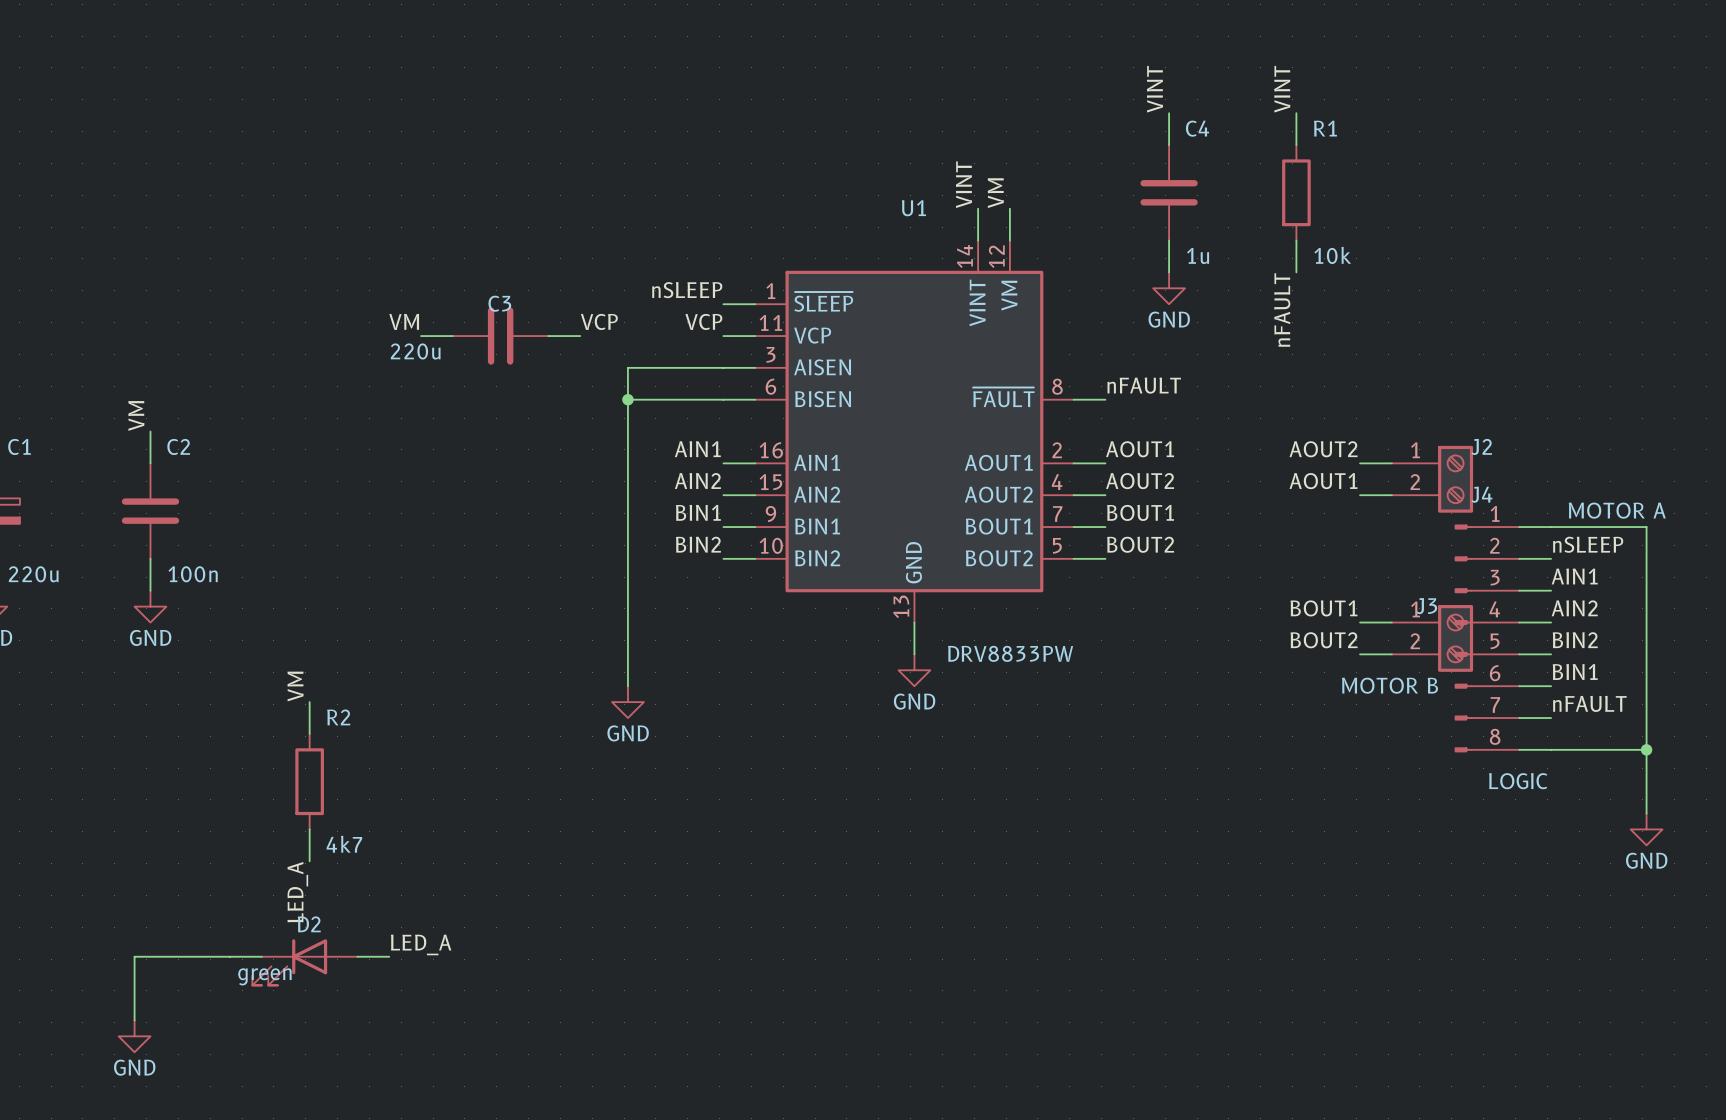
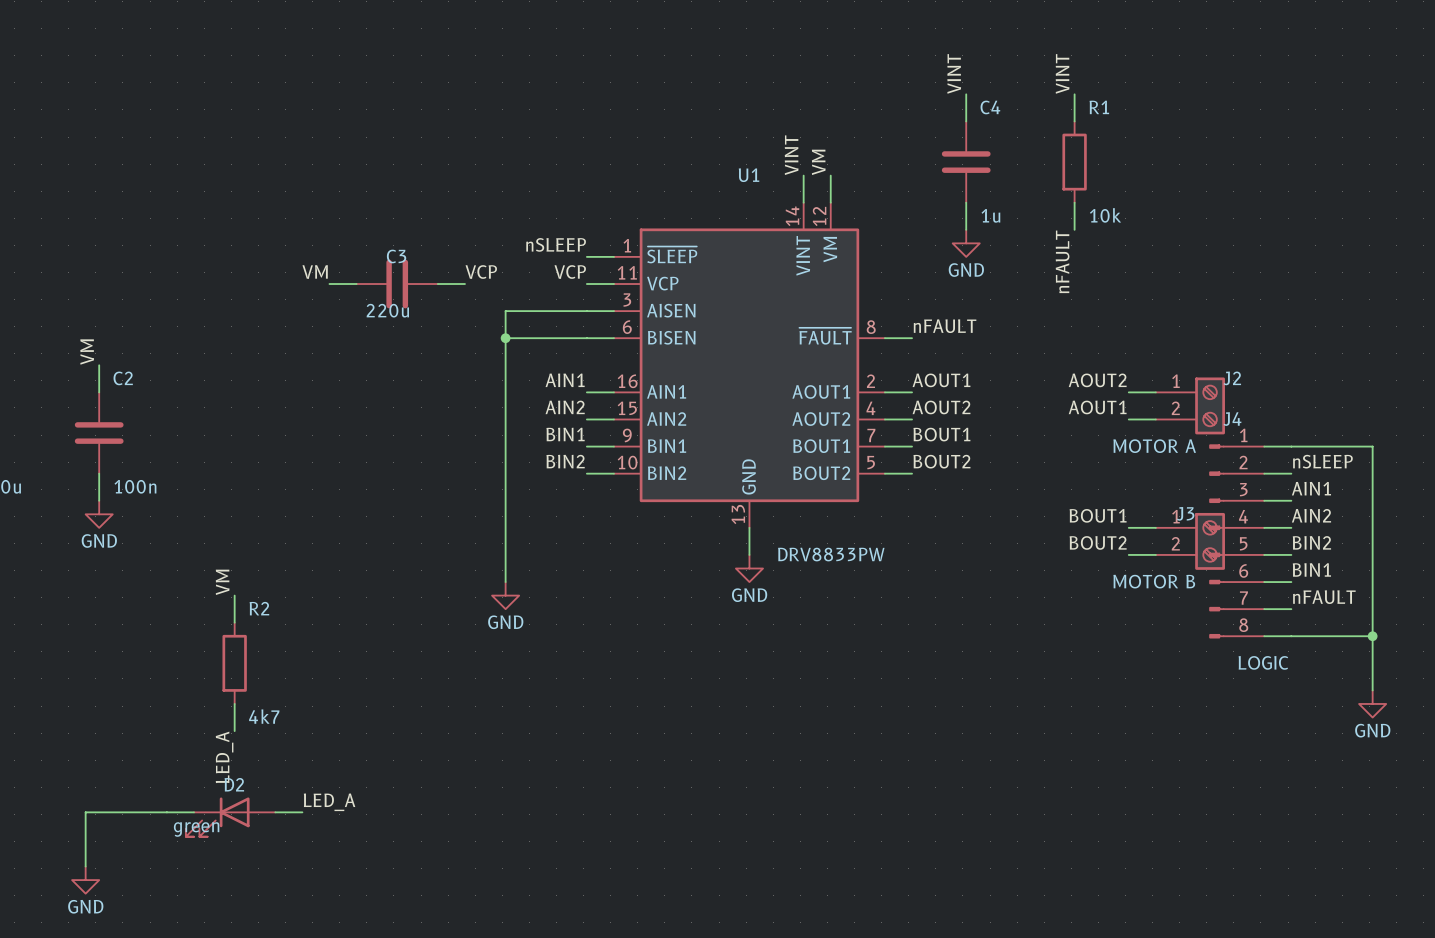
C3 value position: 220u (415, 351) -> 220u (387, 310)
J2 value position: MOTOR A (1617, 510) -> MOTOR A (1154, 446)

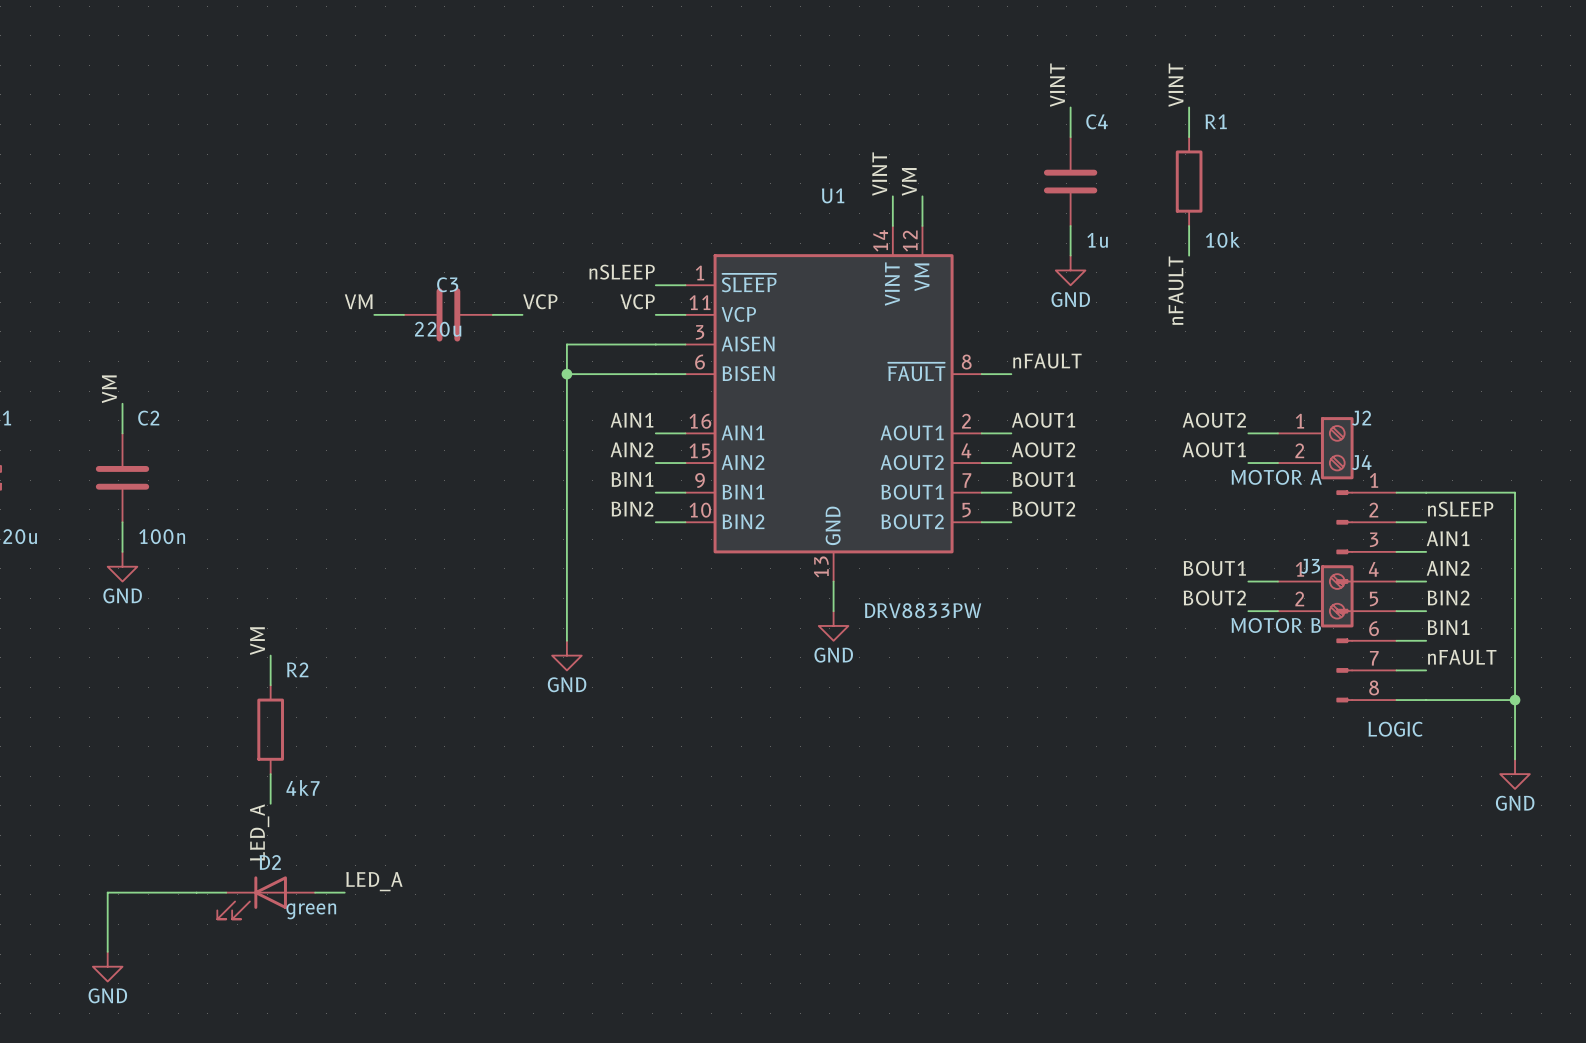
C3 value position: 220u (387, 310) -> 220u (438, 329)
J2 value position: MOTOR A (1154, 446) -> MOTOR A (1276, 477)
J3 value position: MOTOR B (1154, 581) -> MOTOR B (1276, 625)
D2 value position: green (196, 829) -> green (311, 911)

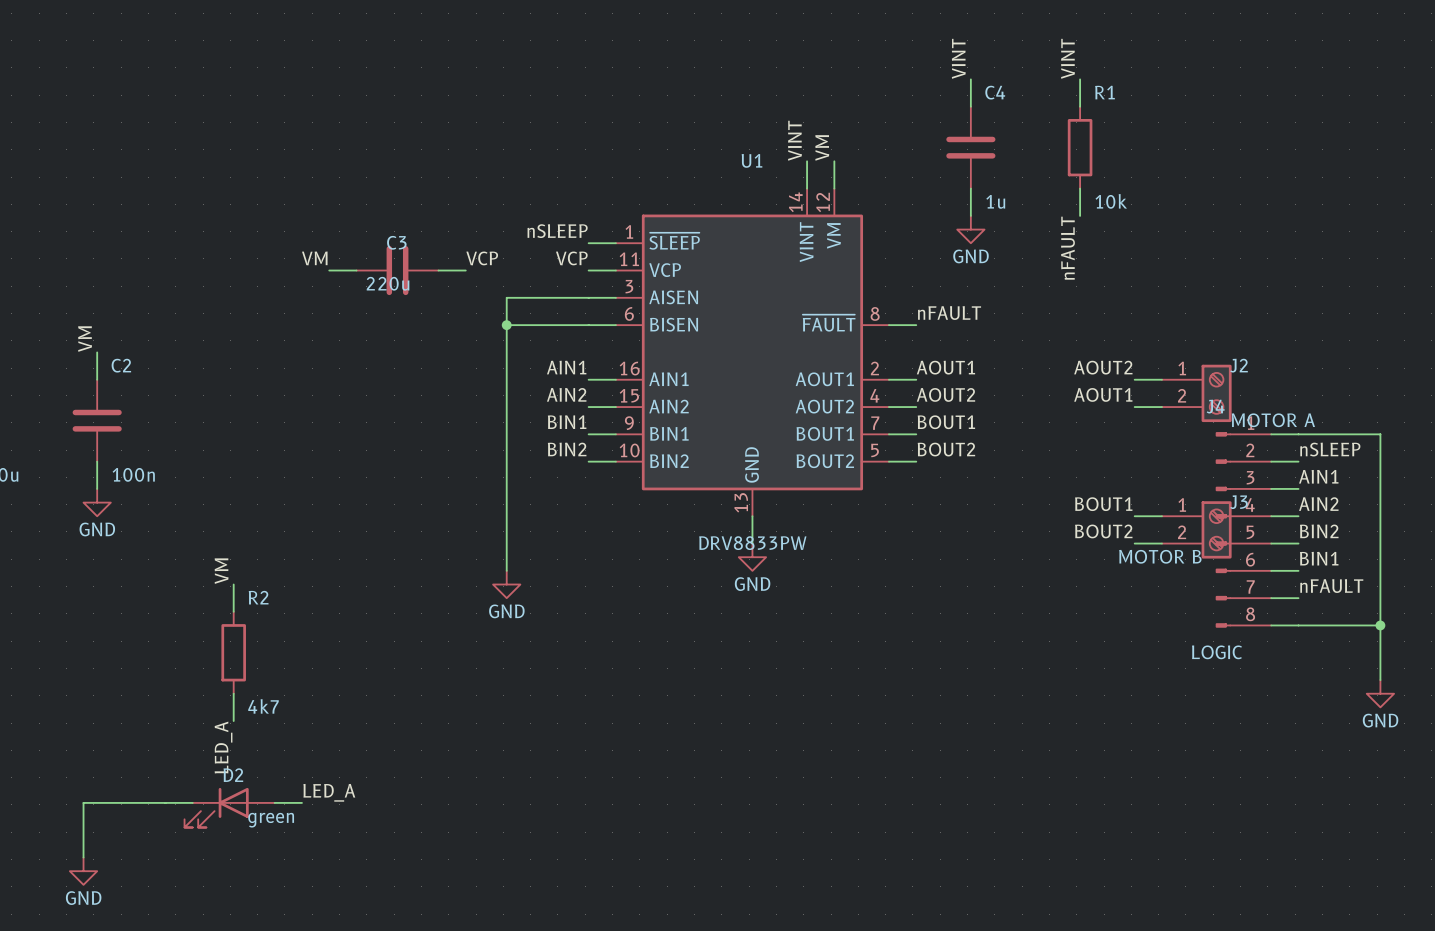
J4 name position: J4 (1361, 462) -> J4 (1215, 406)
J2 value position: MOTOR A (1276, 477) -> MOTOR A (1273, 420)
J3 name position: J3 (1310, 566) -> J3 (1239, 502)
U1 value position: DRV8833PW (923, 610) -> DRV8833PW (752, 543)
J4 value position: LOGIC (1395, 729) -> LOGIC (1216, 652)

